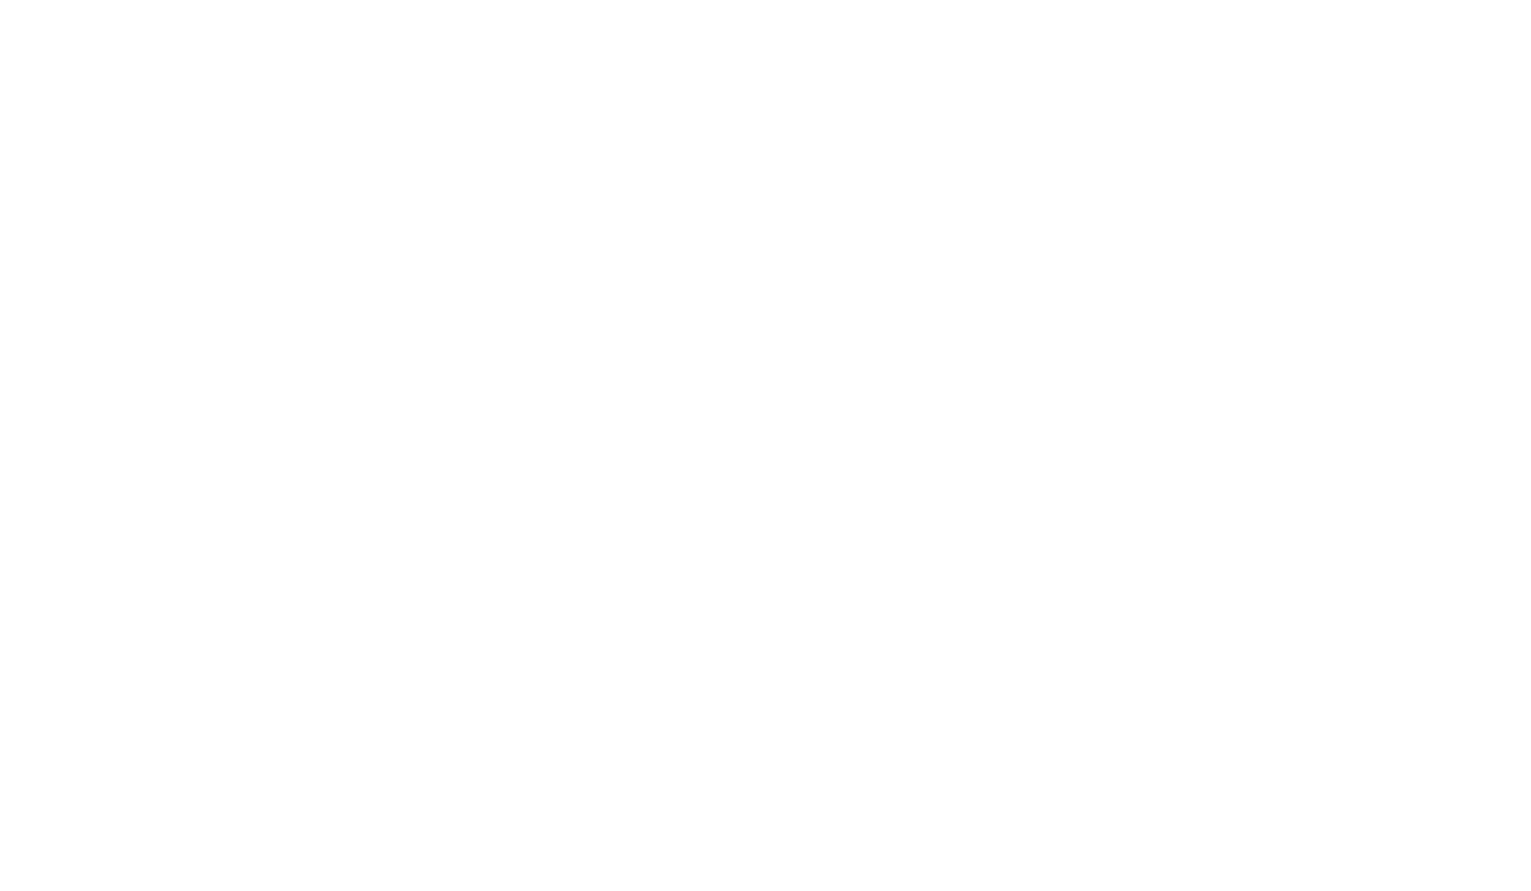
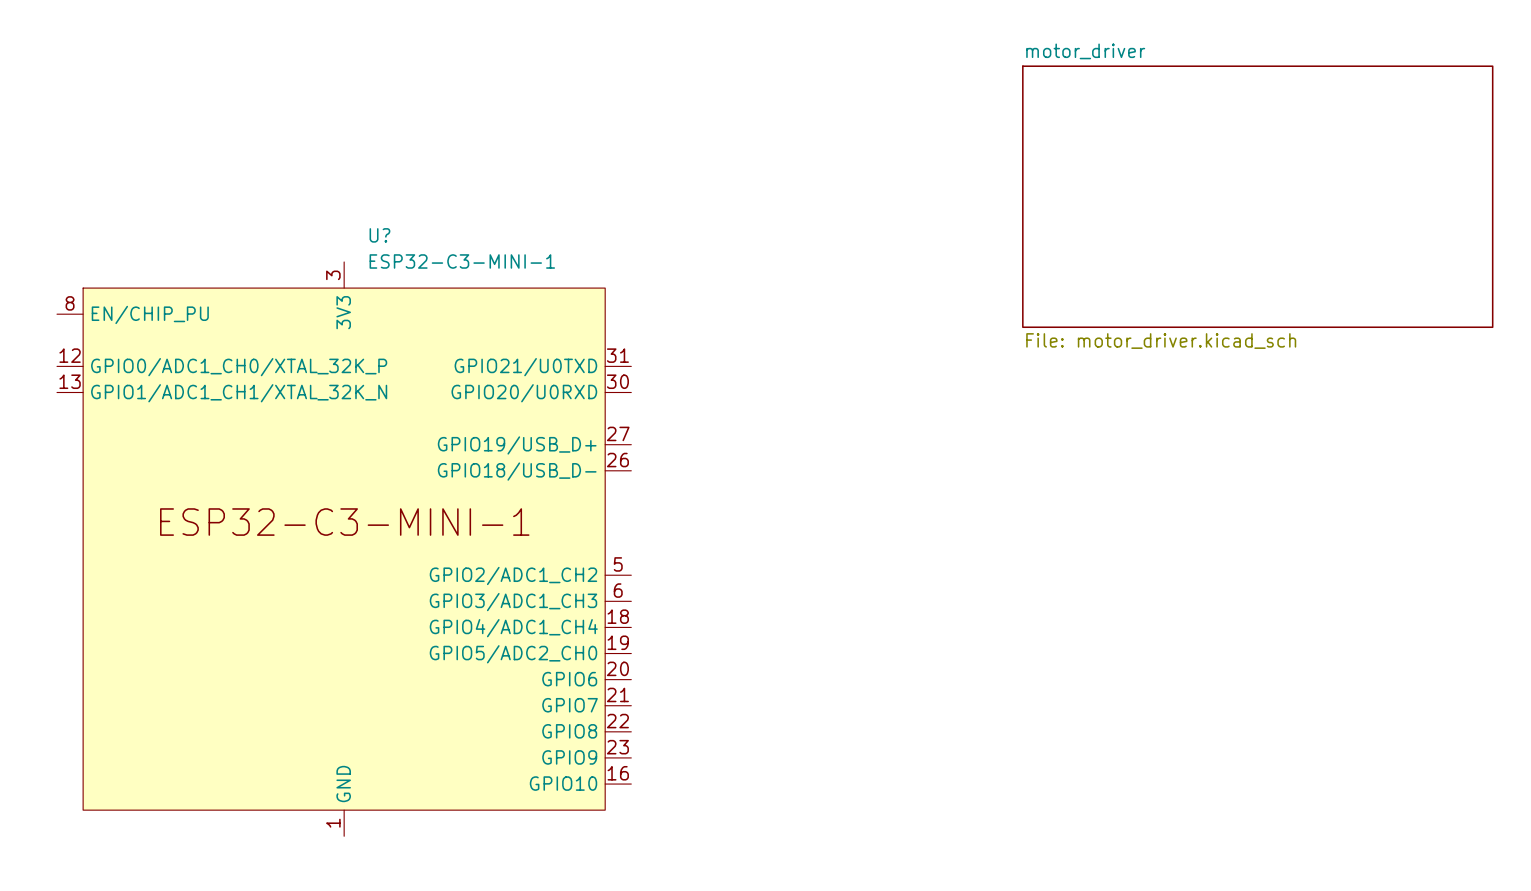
sheet motor_driver: none -> File: motor_driver.kicad_sch (1257, 196)
U?: none -> ESP32-C3-MINI-1 (344, 549)

